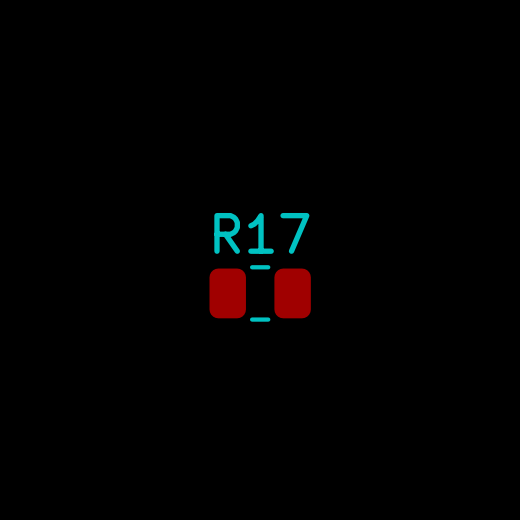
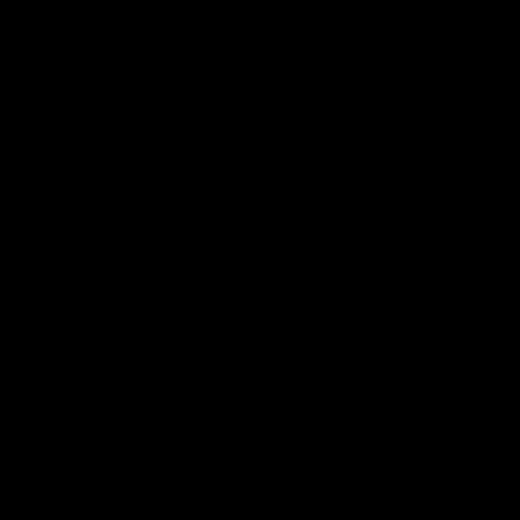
R17: (260, 293) -> none

